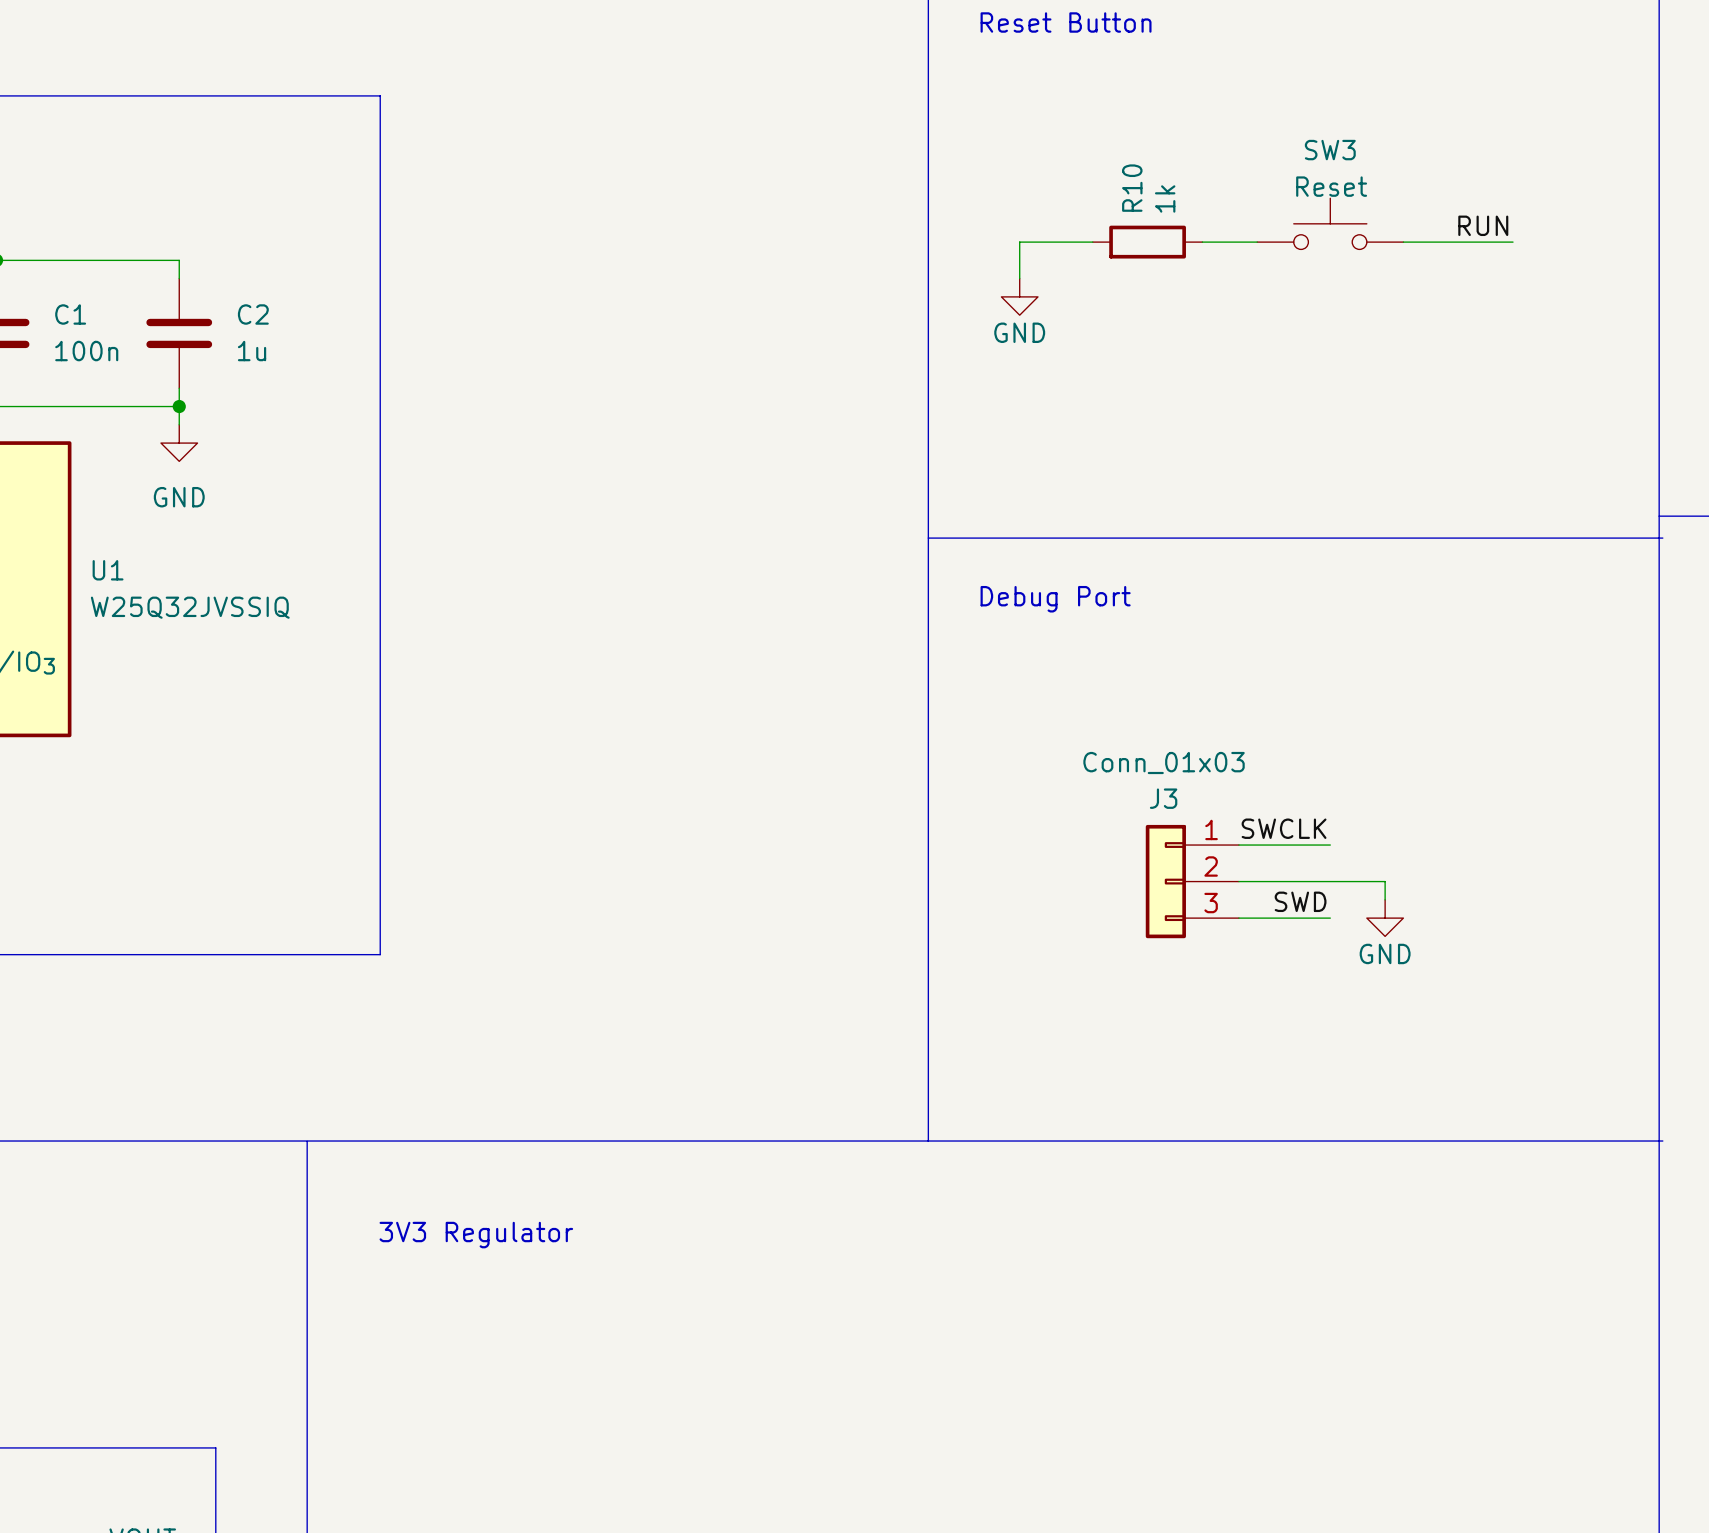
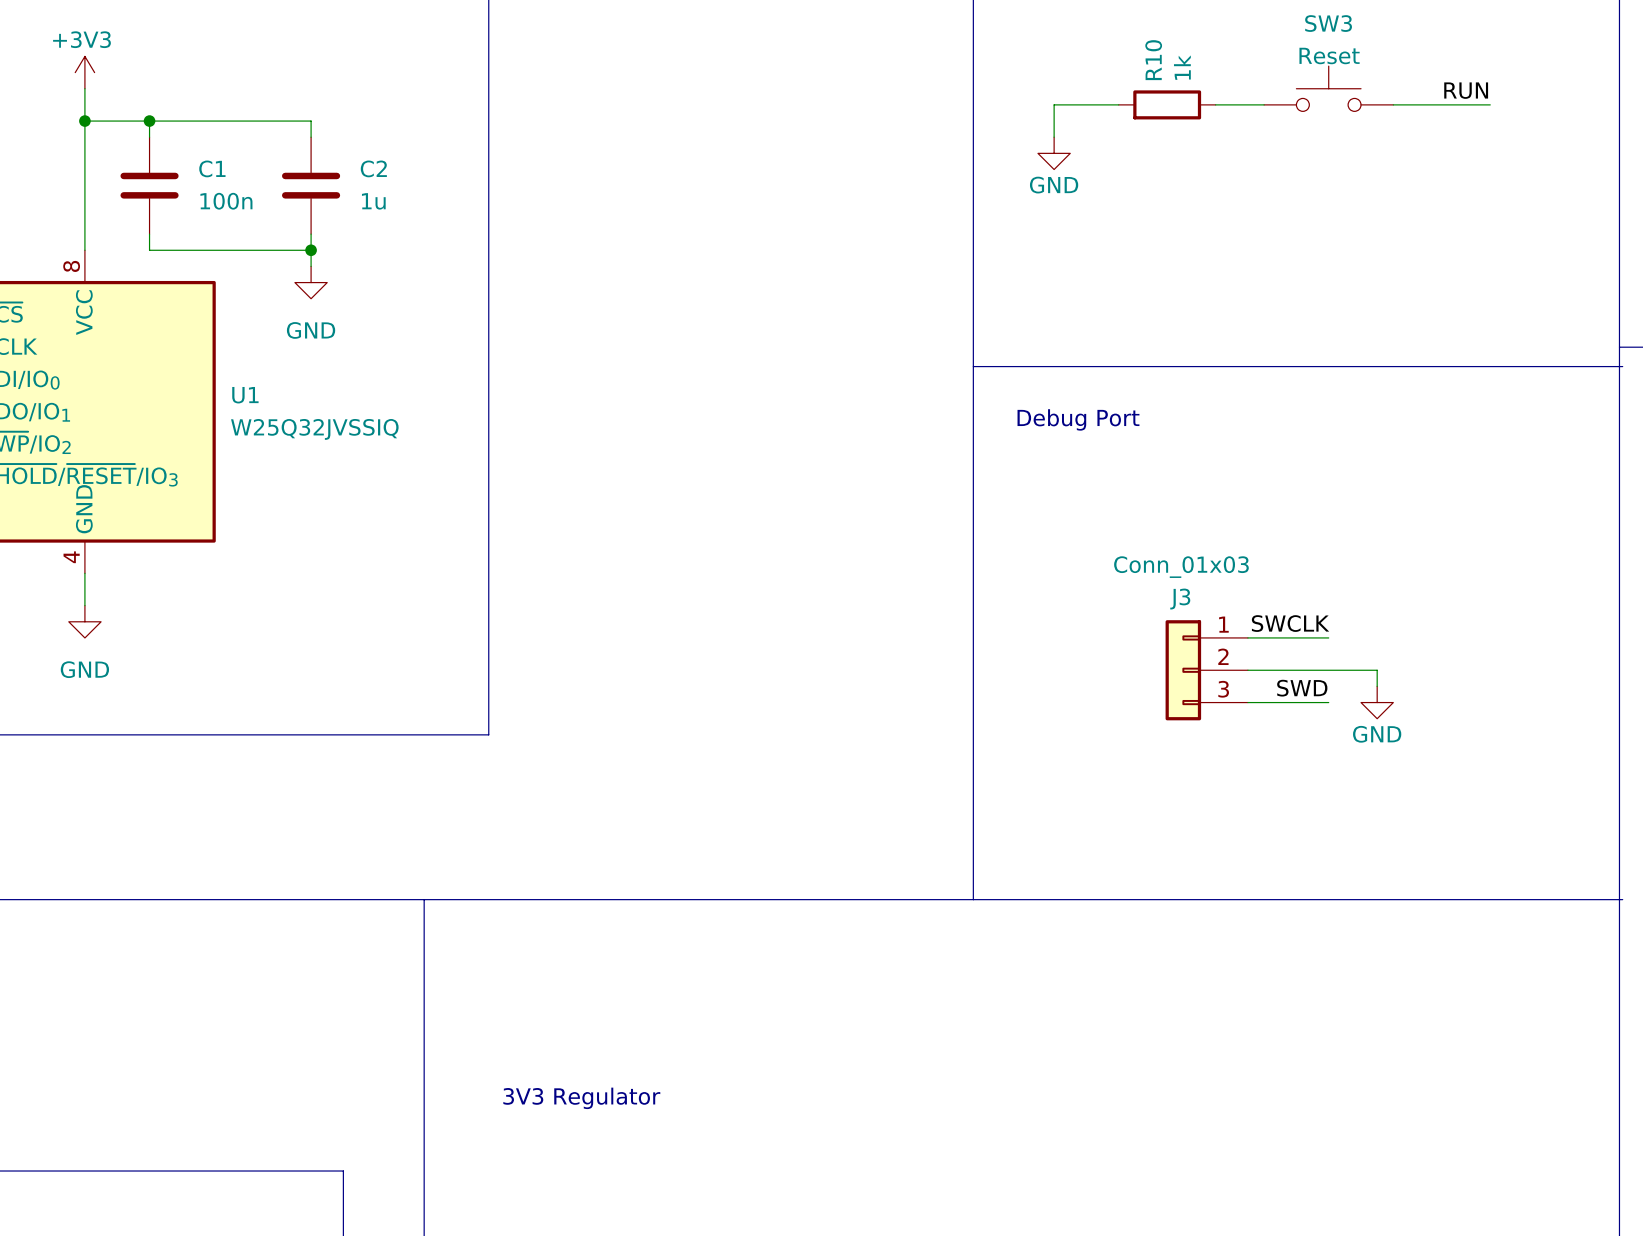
text position: 3V3 Regulator (476, 1235) -> 3V3 Regulator (581, 1098)

